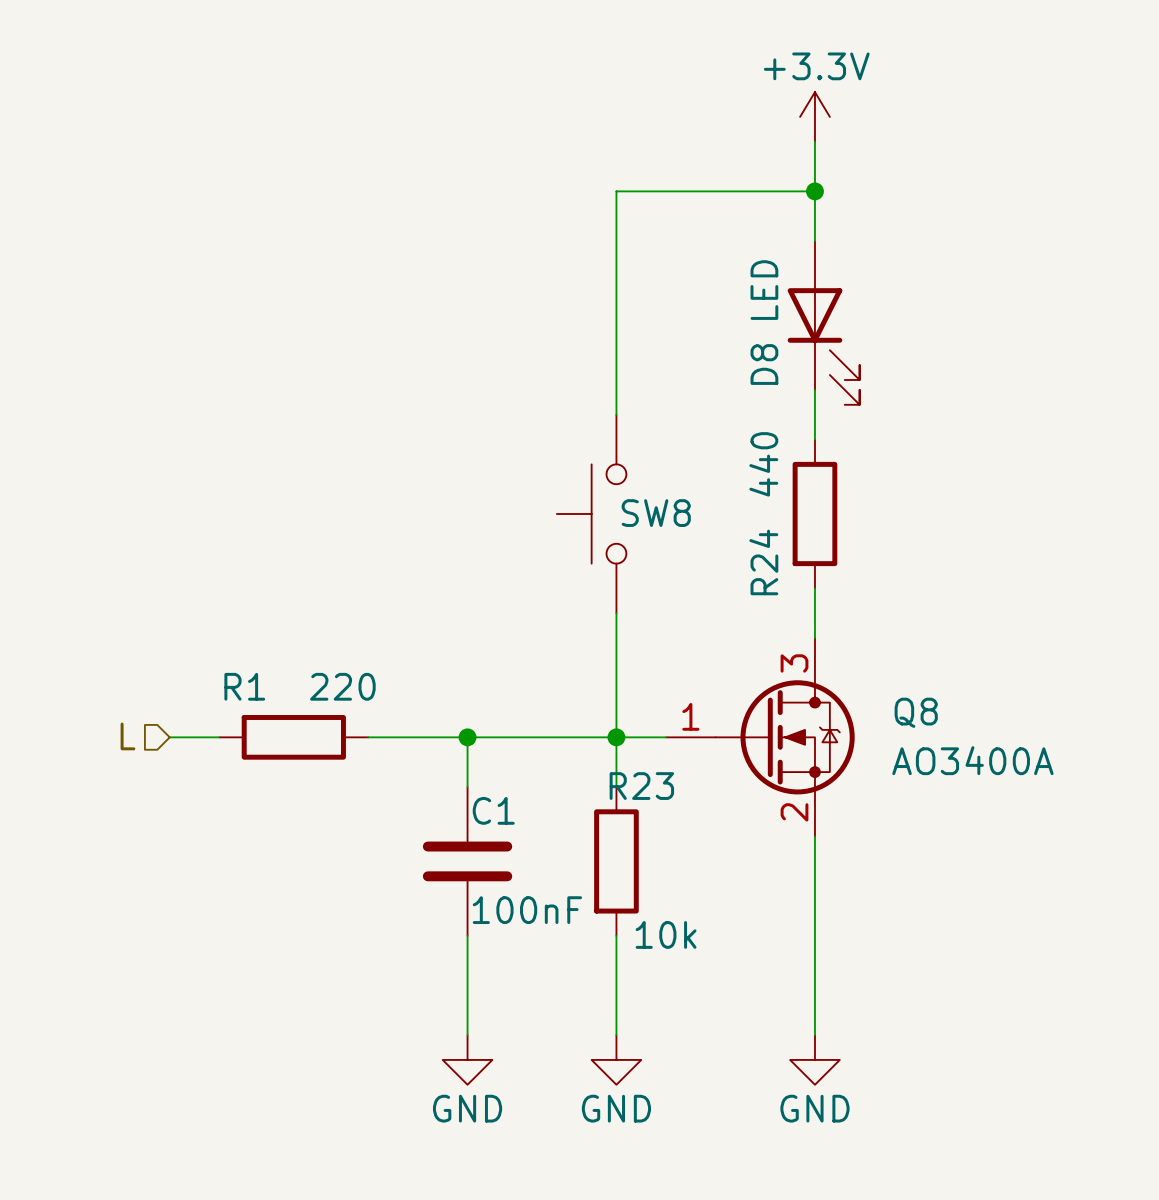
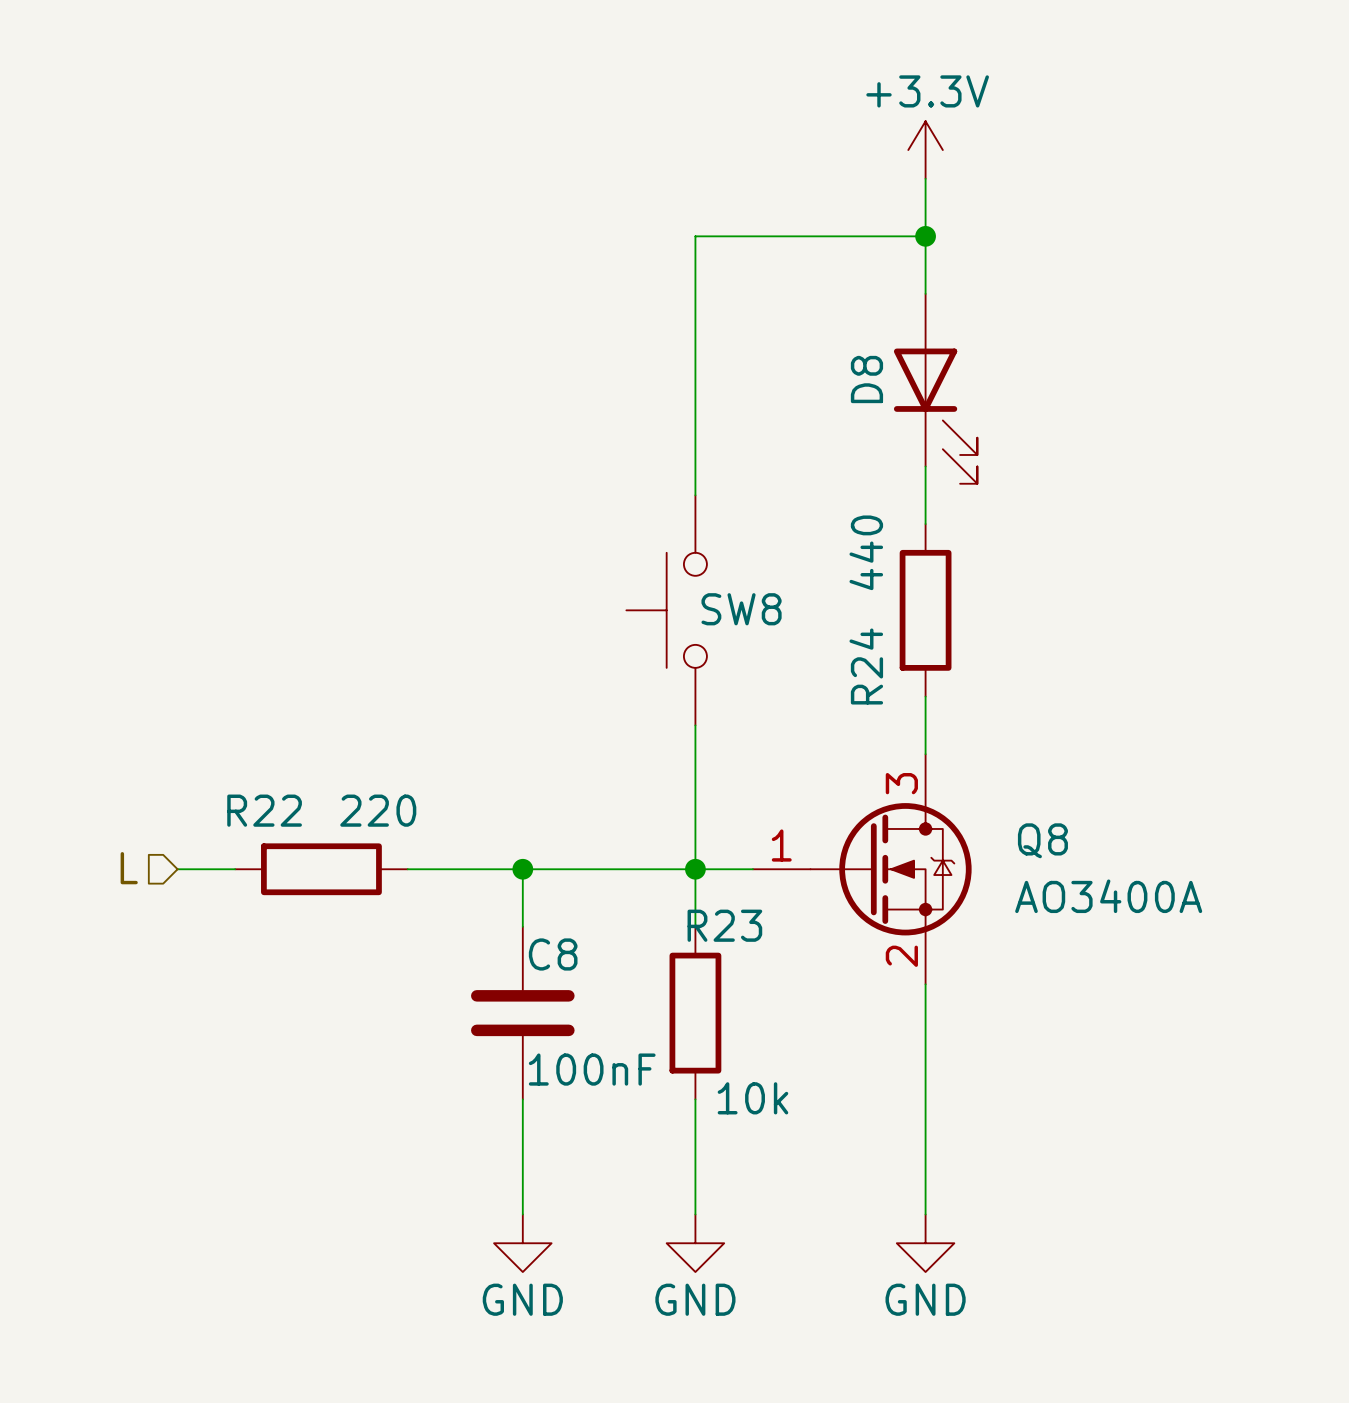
D8 value: LED (764, 290) -> none
D8 name position: D8 (764, 364) -> D8 (866, 379)
R1 name: R1 (244, 686) -> R22 (264, 810)
C1 name: C1 (493, 810) -> C8 (553, 954)

